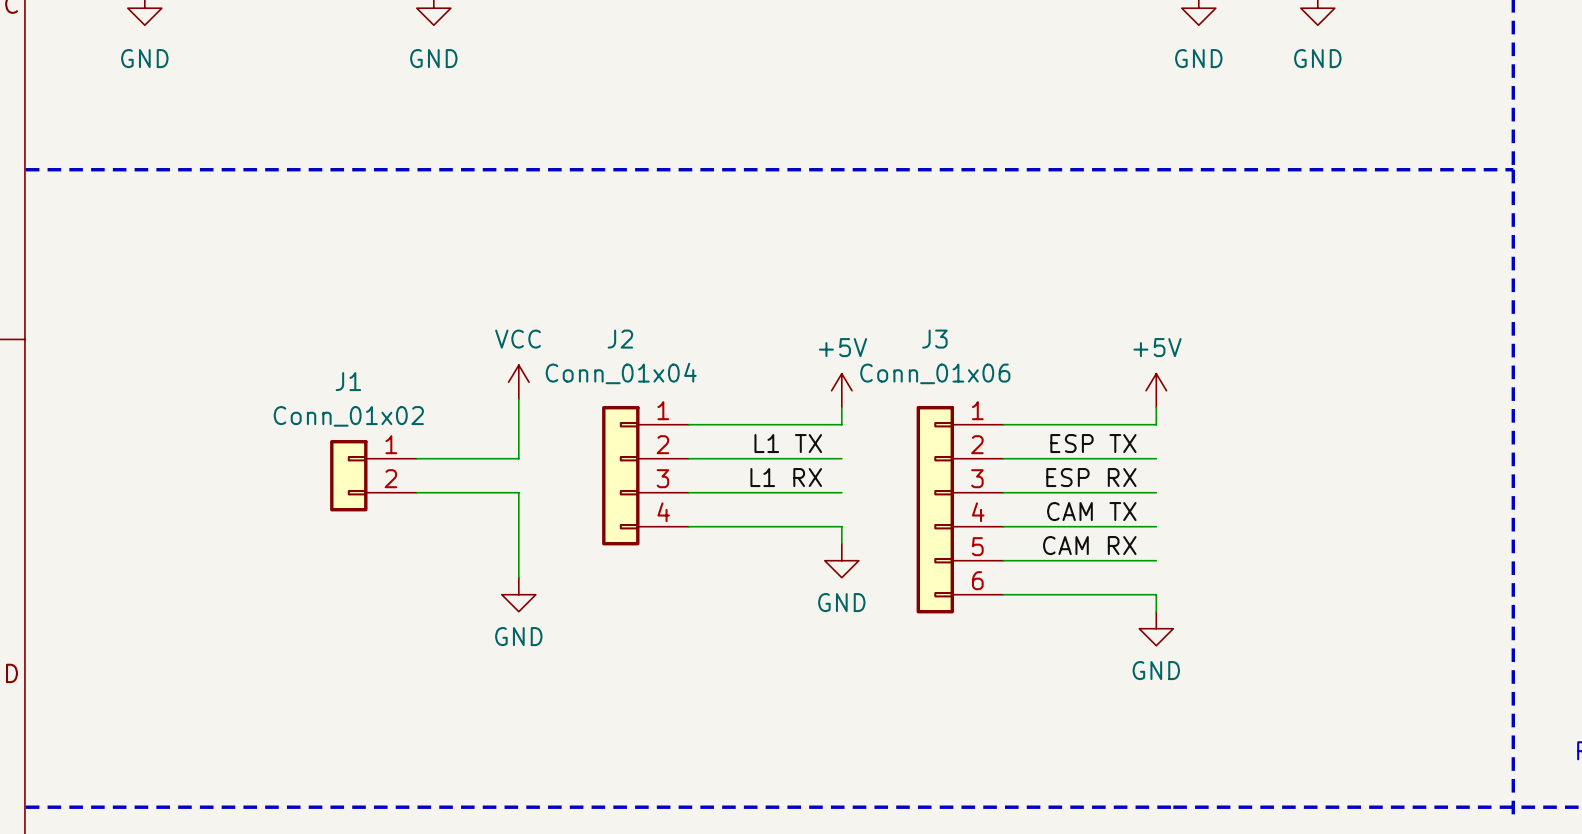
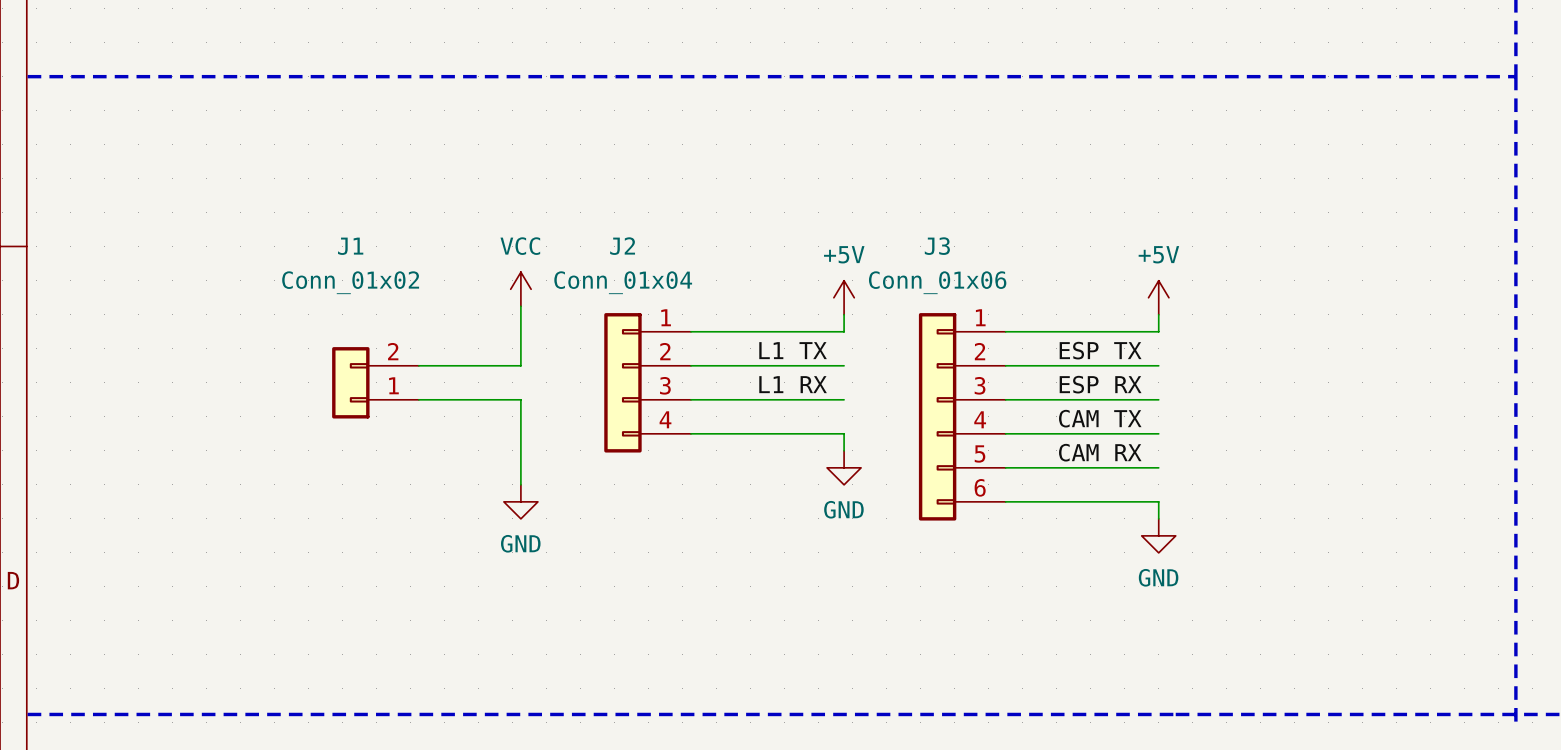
J1 name position: J1 (348, 381) -> J1 (350, 246)
J1 value position: Conn_01x02 (348, 416) -> Conn_01x02 (350, 282)
J1 flip: as is (348, 475) -> up-down (350, 382)

